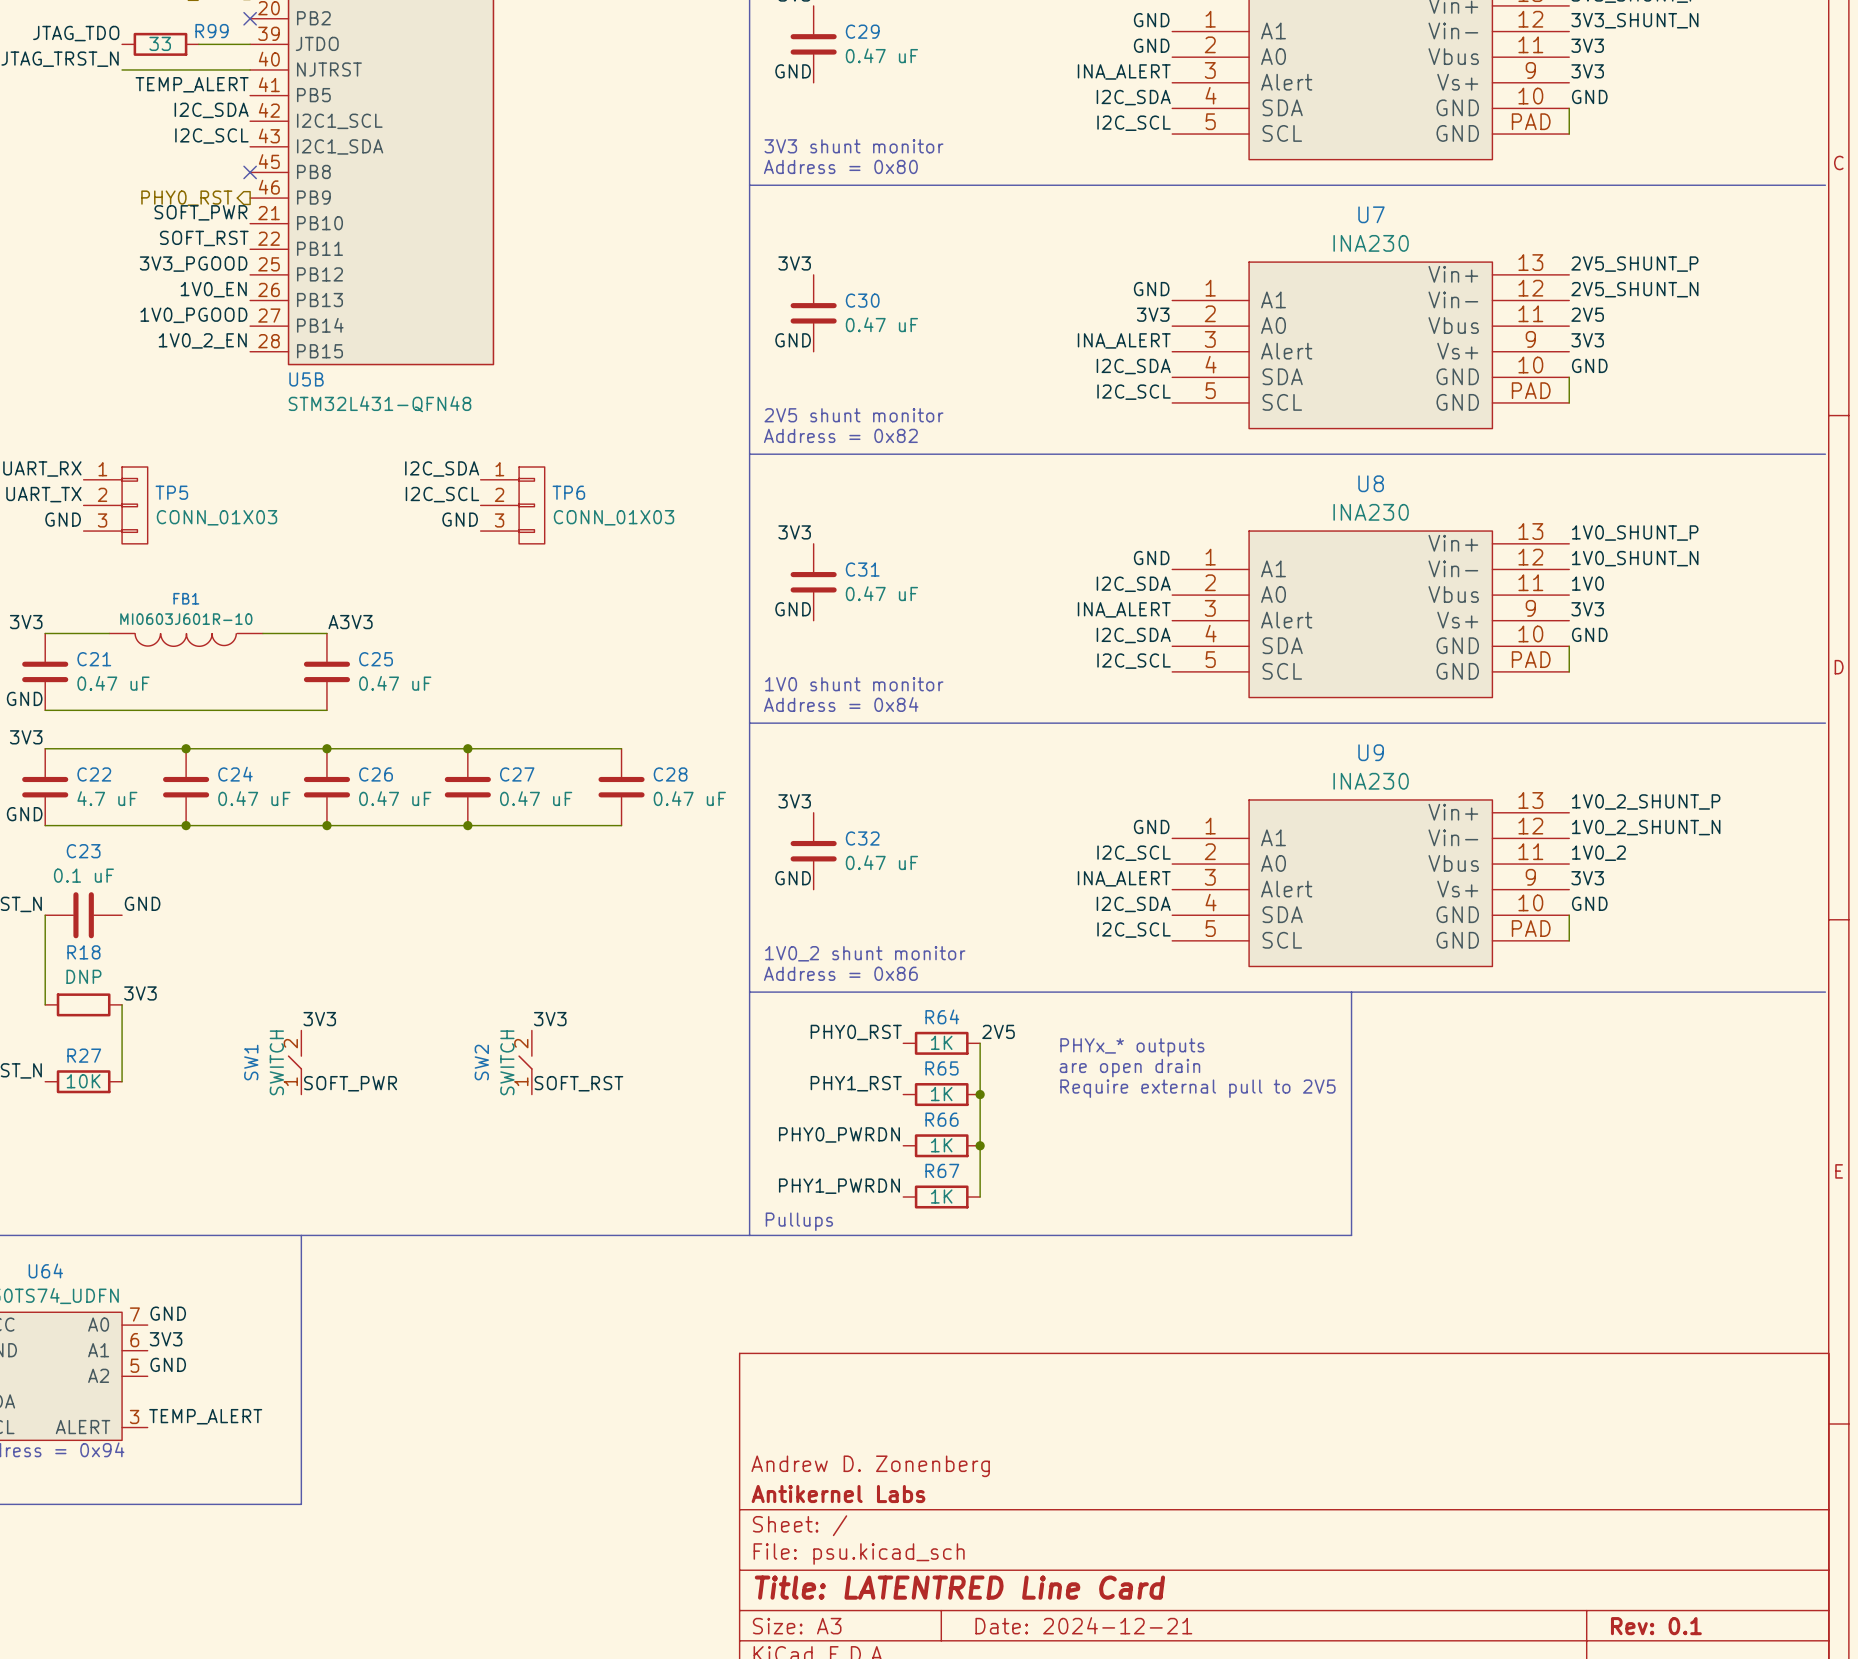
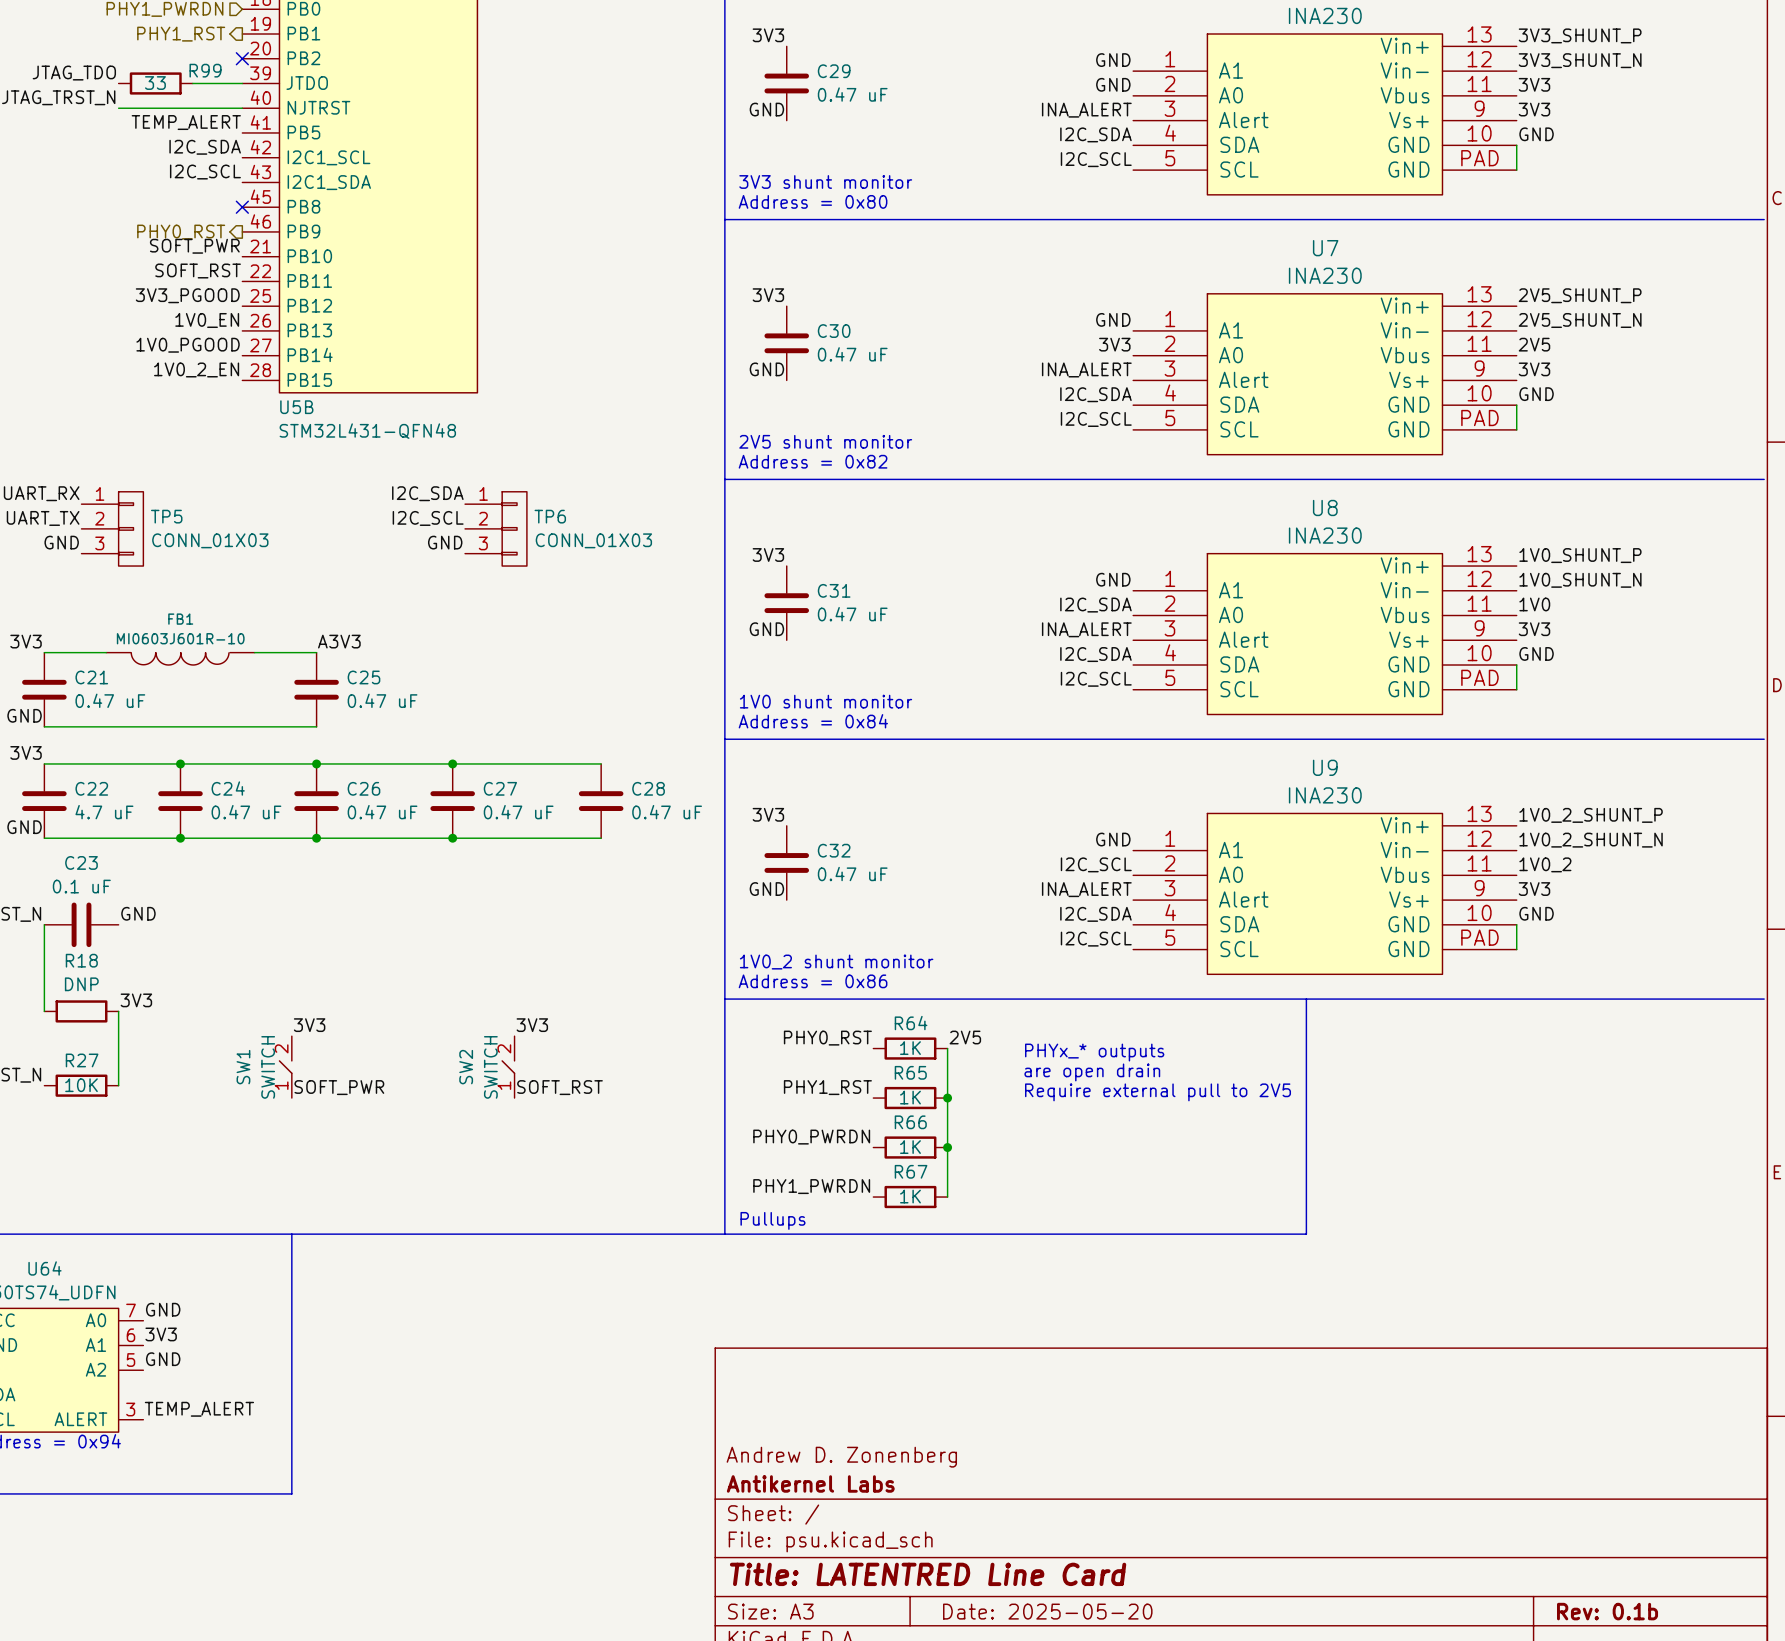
title block: Date: 2024-12-21 (1083, 1625) -> Date: 2025-05-20 (1047, 1611)
title block: Rev: 0.1 (1656, 1626) -> Rev: 0.1b (1607, 1611)

